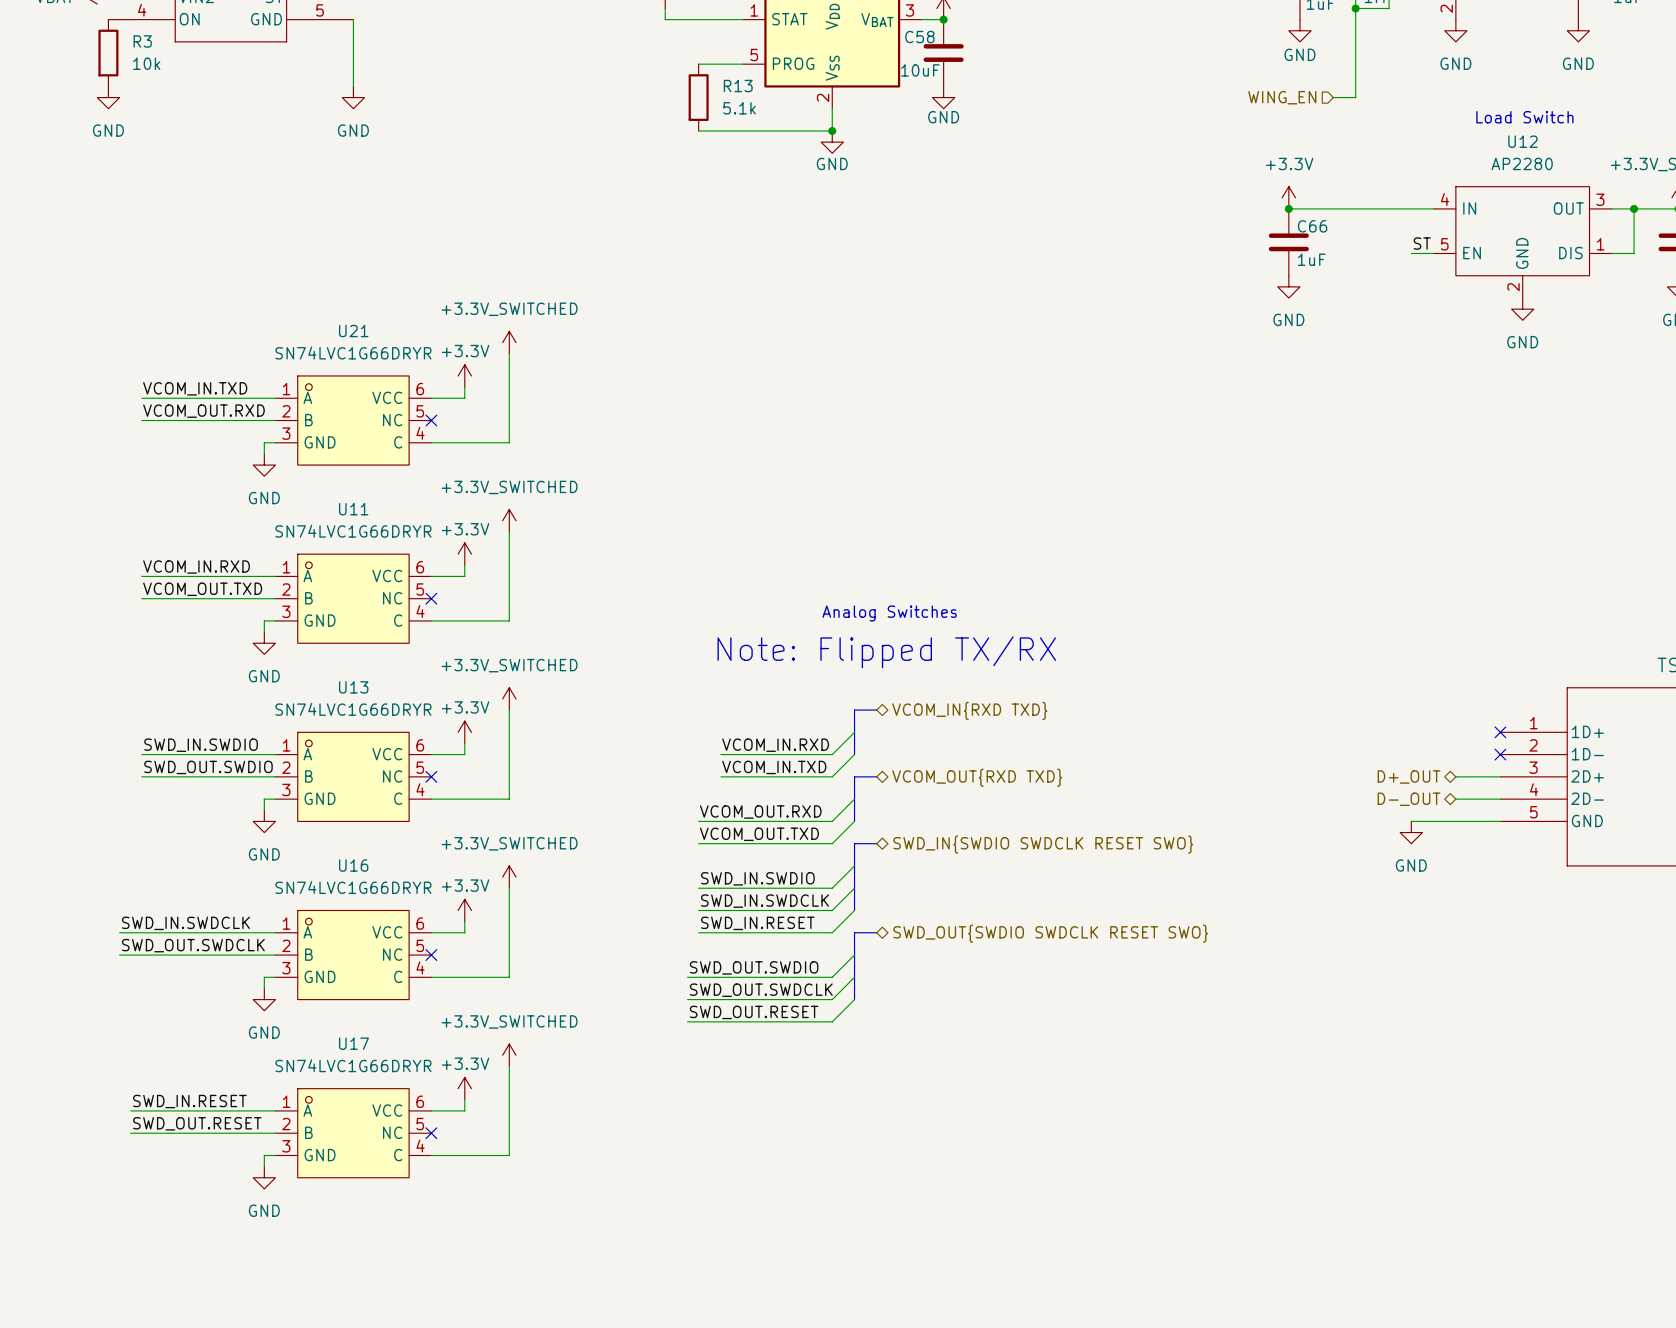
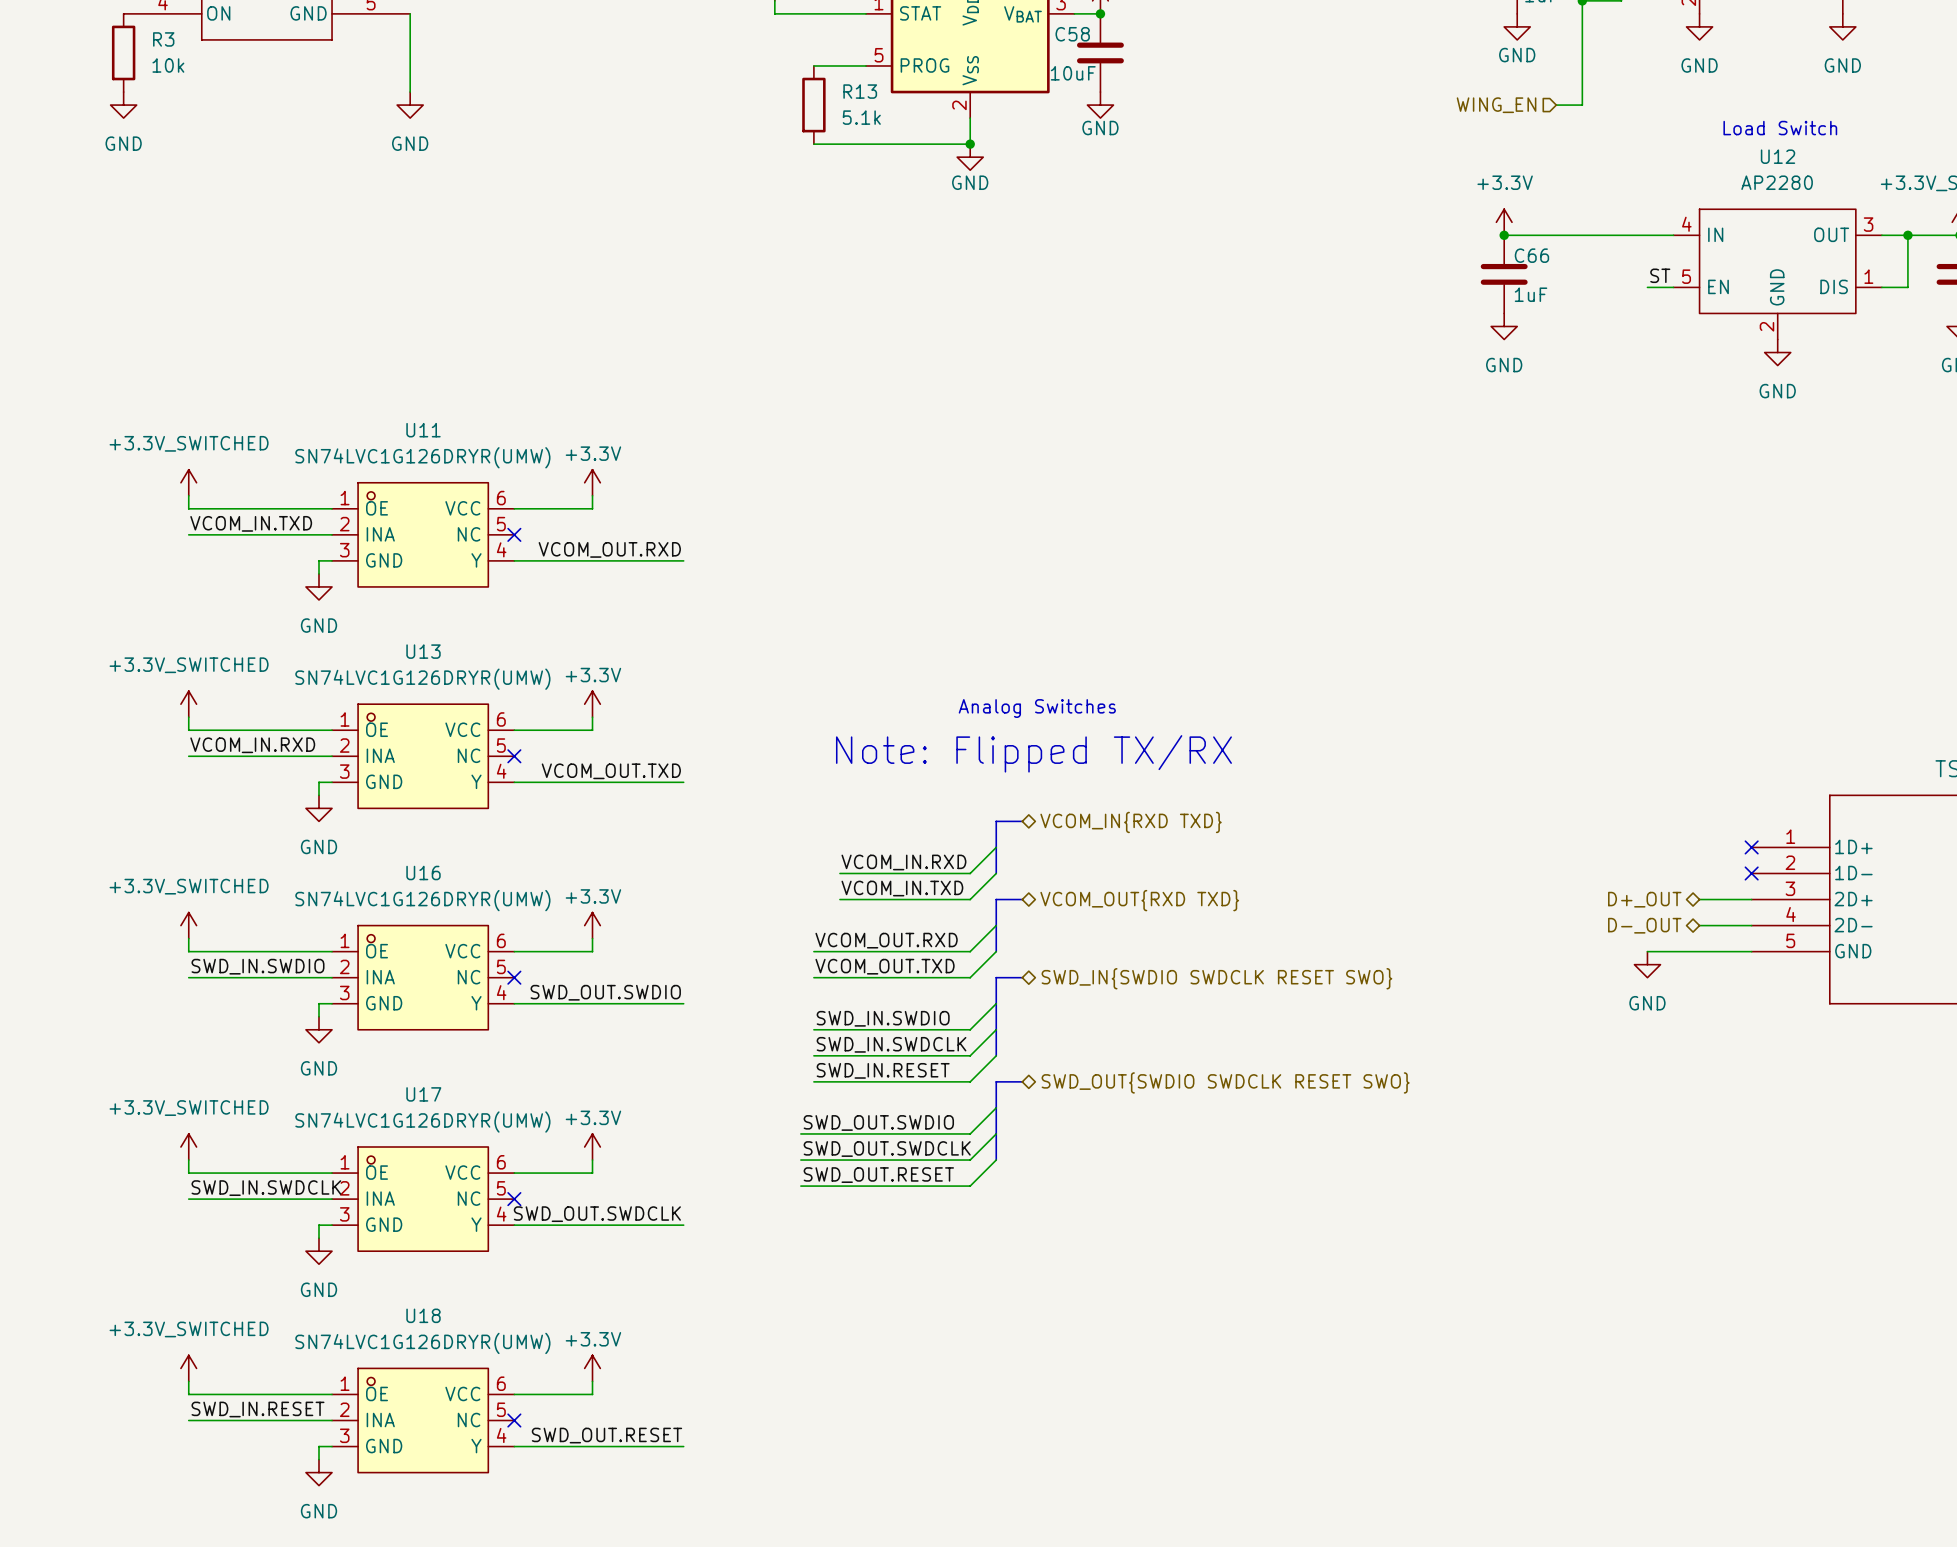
power symbol: +3.3V_SWITCHED (509, 342) -> none
wire: (509, 353) (509, 431) -> none
power symbol position: +3.3V (464, 375) -> +3.3V (592, 482)
wire: (464, 387) (464, 398) (431, 398) -> none
label position: VCOM_IN.TXD (195, 388) -> VCOM_IN.TXD (251, 523)
wire: (141, 398) (275, 398) -> none
label: VCOM_OUT.RXD (203, 411) -> none
wire: (141, 420) (275, 420) -> none
power symbol: none -> +3.3V_SWITCHED (188, 482)
U21: SN74LVC1G66DRYR (353, 420) -> none
no-connect mark position: (431, 420) -> (514, 534)
wire: (264, 442) (264, 453) -> (305, 508) (188, 508) (188, 495)
wire: none -> (188, 534) (332, 534)
power symbol position: GND (264, 465) -> GND (319, 586)
label: none -> VCOM_OUT.RXD (609, 549)
wire: none -> (332, 560) (319, 560) (319, 573)
wire: none -> (514, 560) (683, 560)
power symbol: +3.3V_SWITCHED (509, 520) -> none
U11 value: SN74LVC1G66DRYR (353, 531) -> SN74LVC1G126DRYR(UMW) (422, 457)
wire: (509, 531) (509, 620) (431, 620) -> none
power symbol: +3.3V (464, 554) -> none
wire: (464, 565) (464, 576) (431, 576) -> none
label position: VCOM_IN.RXD (196, 567) -> VCOM_IN.RXD (252, 745)
wire: (141, 576) (275, 576) -> none
U11 pin name: A (307, 576) -> OE (377, 508)
label: VCOM_OUT.TXD (202, 589) -> none
wire: (141, 598) (275, 598) -> none
U11 pin name: B (308, 598) -> INA (380, 534)
U11 position: (353, 598) -> (423, 534)
no-connect mark: (431, 598) -> none
power symbol: none -> +3.3V_SWITCHED (188, 704)
power symbol: none -> +3.3V (592, 704)
wire: none -> (188, 717) (188, 730) (332, 730)
wire: (275, 620) (264, 620) (264, 632) -> (332, 782) (319, 782) (319, 795)
U11 pin name: C (398, 620) -> Y (476, 560)
wire: none -> (592, 717) (592, 730) (514, 730)
power symbol position: GND (264, 643) -> GND (319, 808)
wire: none -> (188, 756) (332, 756)
no-connect mark: none -> (514, 756)
label: none -> VCOM_OUT.TXD (611, 771)
wire: none -> (514, 782) (683, 782)
power symbol: +3.3V_SWITCHED (509, 698) -> none
U13 value: SN74LVC1G66DRYR (353, 709) -> SN74LVC1G126DRYR(UMW) (422, 679)
wire: (509, 710) (509, 799) (431, 799) -> none
power symbol: +3.3V (464, 732) -> none
wire: (464, 743) (464, 754) (431, 754) -> none
label position: SWD_IN.SWDIO (201, 745) -> SWD_IN.SWDIO (258, 966)
wire: (141, 754) (275, 754) -> none
U13 pin name: A (307, 754) -> OE (377, 729)
label: SWD_OUT.SWDIO (208, 767) -> none
wire: (141, 776) (275, 776) -> none
U13 pin name: B (308, 776) -> INA (380, 755)
U13 position: (353, 776) -> (423, 756)
no-connect mark: (431, 776) -> none
U13 pin name: C (398, 798) -> Y (476, 781)
power symbol: none -> +3.3V_SWITCHED (188, 925)
wire: (275, 799) (264, 799) (264, 810) -> (332, 1003) (319, 1003) (319, 1016)
power symbol: none -> +3.3V (592, 925)
wire: none -> (188, 938) (188, 951) (332, 951)
wire: none -> (592, 938) (592, 951) (514, 951)
power symbol: GND (264, 821) -> none
wire: none -> (188, 977) (332, 977)
no-connect mark: none -> (514, 977)
label: none -> SWD_OUT.SWDIO (605, 992)
wire: none -> (514, 1003) (683, 1003)
power symbol: +3.3V_SWITCHED (509, 877) -> none
U16 value: SN74LVC1G66DRYR (353, 887) -> SN74LVC1G126DRYR(UMW) (422, 900)
power symbol: none -> GND (319, 1029)
wire: (509, 888) (509, 977) (431, 977) -> none
power symbol: +3.3V (464, 910) -> none
wire: (464, 921) (464, 932) (431, 932) -> none
label position: SWD_IN.SWDCLK (185, 923) -> SWD_IN.SWDCLK (266, 1188)
wire: (119, 932) (275, 932) -> none
U16 pin name: A (307, 932) -> OE (377, 951)
label: SWD_OUT.SWDCLK (193, 945) -> none
U16 pin name: B (308, 954) -> INA (380, 977)
wire: (119, 955) (275, 955) -> none
U16 position: (353, 955) -> (423, 977)
no-connect mark: (431, 955) -> none
U16 pin name: C (398, 976) -> Y (476, 1003)
wire: (275, 977) (264, 977) (264, 988) -> (332, 1225) (319, 1225) (319, 1238)
power symbol: none -> +3.3V_SWITCHED (188, 1147)
power symbol: none -> +3.3V (592, 1147)
wire: none -> (188, 1160) (188, 1173) (332, 1173)
power symbol: GND (264, 999) -> none
wire: none -> (592, 1160) (592, 1173) (514, 1173)
wire: none -> (188, 1199) (332, 1199)
no-connect mark: none -> (514, 1199)
label: none -> SWD_OUT.SWDCLK (597, 1214)
wire: none -> (514, 1225) (683, 1225)
power symbol: +3.3V_SWITCHED (509, 1055) -> none
U17 value: SN74LVC1G66DRYR (353, 1065) -> SN74LVC1G126DRYR(UMW) (422, 1122)
wire: (509, 1066) (509, 1155) (431, 1155) -> none
power symbol: none -> GND (319, 1251)
power symbol: +3.3V (464, 1088) -> none
wire: (464, 1099) (464, 1110) (431, 1110) -> none
label position: SWD_IN.RESET (189, 1101) -> SWD_IN.RESET (258, 1409)
wire: (130, 1110) (275, 1110) -> none
U17 pin name: A (307, 1110) -> OE (377, 1172)
label: SWD_OUT.RESET (197, 1123) -> none
U17 pin name: B (308, 1132) -> INA (380, 1198)
wire: (130, 1133) (275, 1133) -> none
U17 position: (353, 1133) -> (423, 1199)
no-connect mark: (431, 1133) -> none
wire: (275, 1155) (264, 1155) (264, 1166) -> (332, 1446) (319, 1446) (319, 1459)
U17 pin name: C (398, 1155) -> Y (476, 1224)
power symbol: none -> +3.3V_SWITCHED (188, 1368)
power symbol: GND (264, 1177) -> none
power symbol: none -> +3.3V (592, 1368)
wire: none -> (188, 1381) (188, 1394) (332, 1394)
wire: none -> (592, 1381) (592, 1394) (514, 1394)
wire: none -> (188, 1420) (332, 1420)
U18: none -> SN74LVC1G126DRYR(UMW) (423, 1420)
no-connect mark: none -> (514, 1420)
label: none -> SWD_OUT.RESET (606, 1435)
wire: none -> (514, 1446) (683, 1446)
power symbol: none -> GND (319, 1472)

